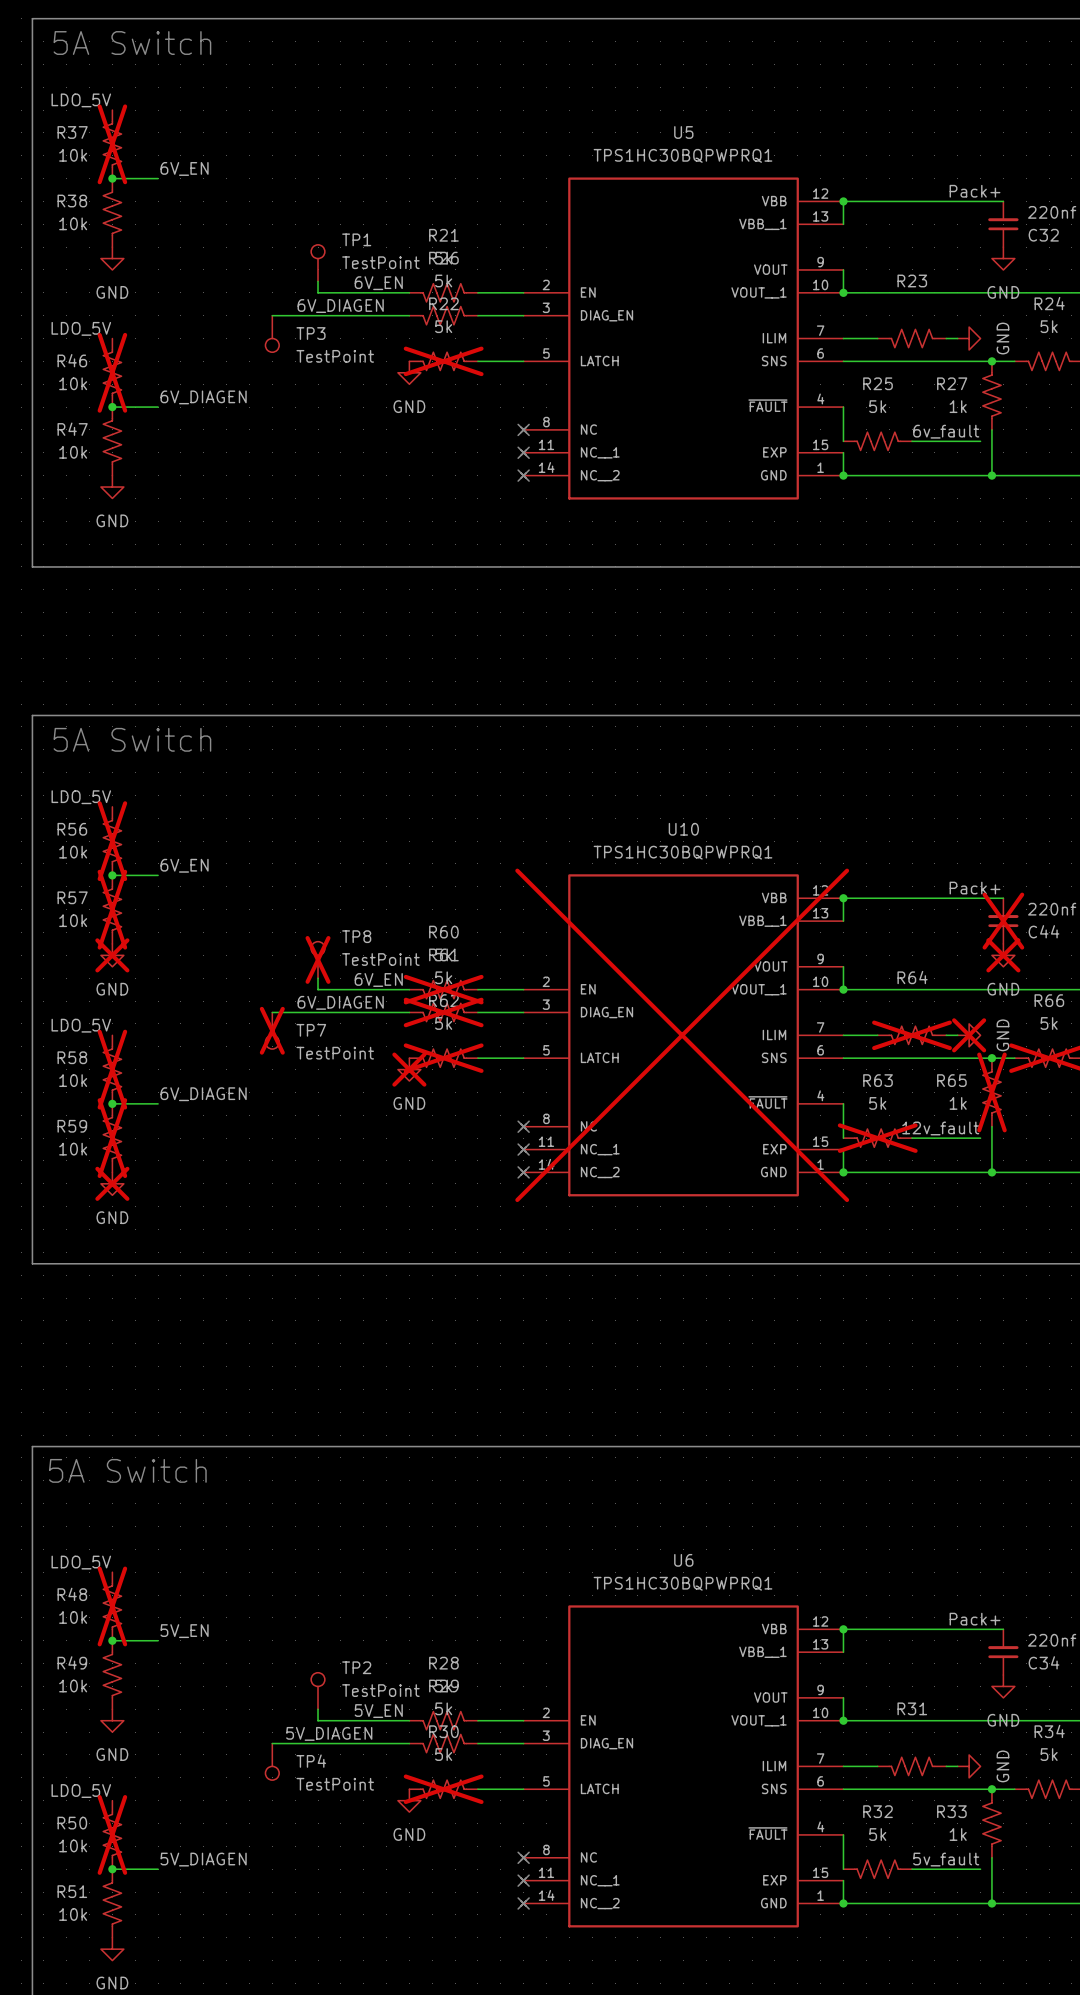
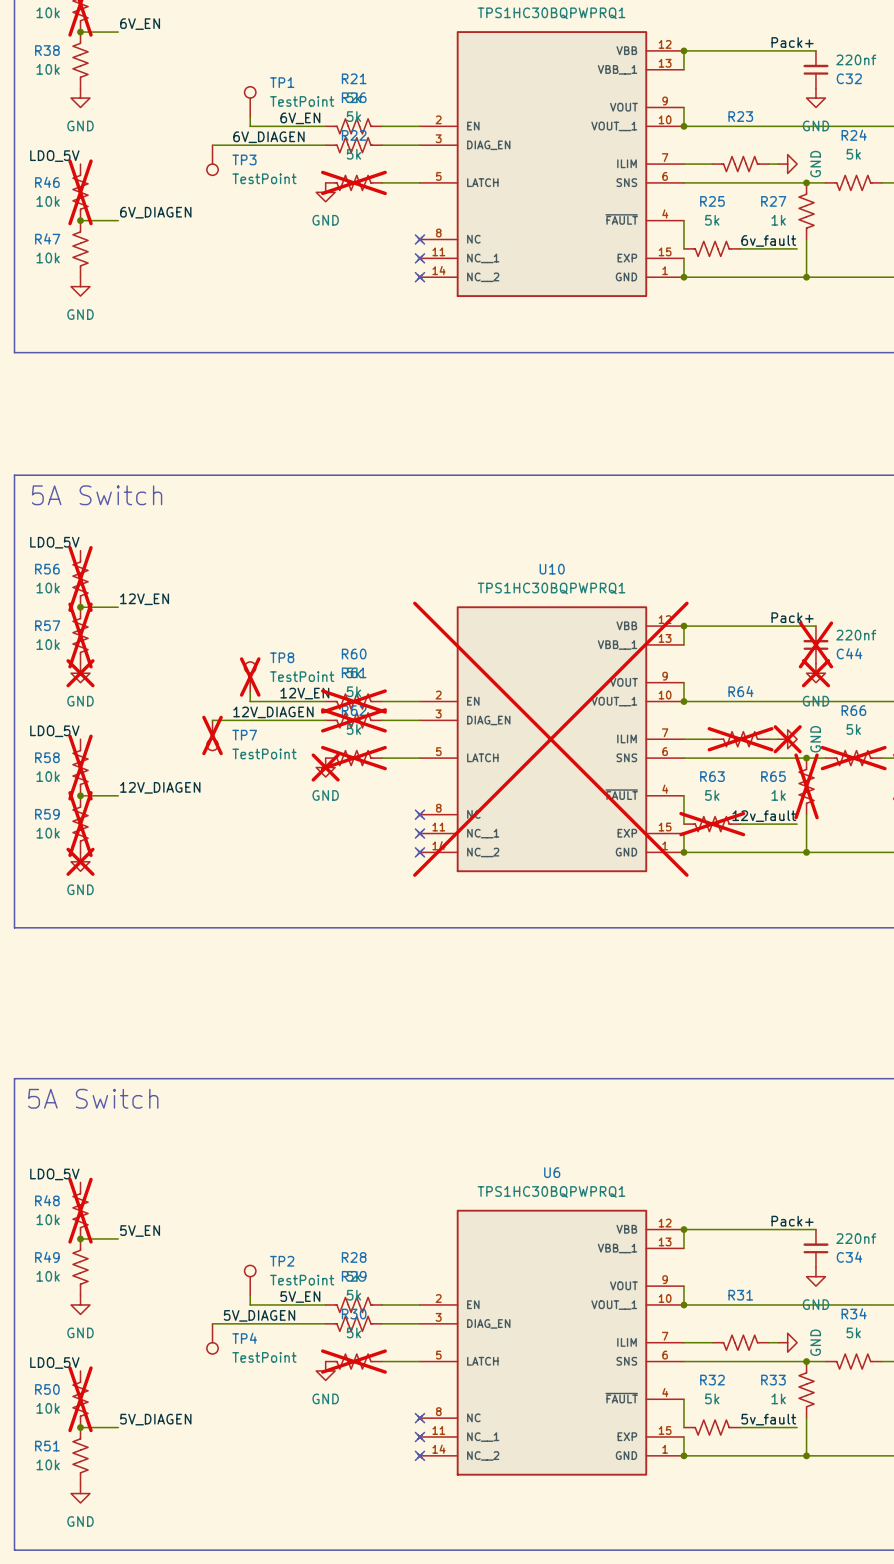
label: 6V_EN (184, 865) -> 12V_EN (144, 599)
label: 6V_EN (378, 979) -> 12V_EN (304, 693)
label: 6V_DIAGEN (340, 1002) -> 12V_DIAGEN (273, 712)
label: 6V_DIAGEN (203, 1094) -> 12V_DIAGEN (160, 787)

